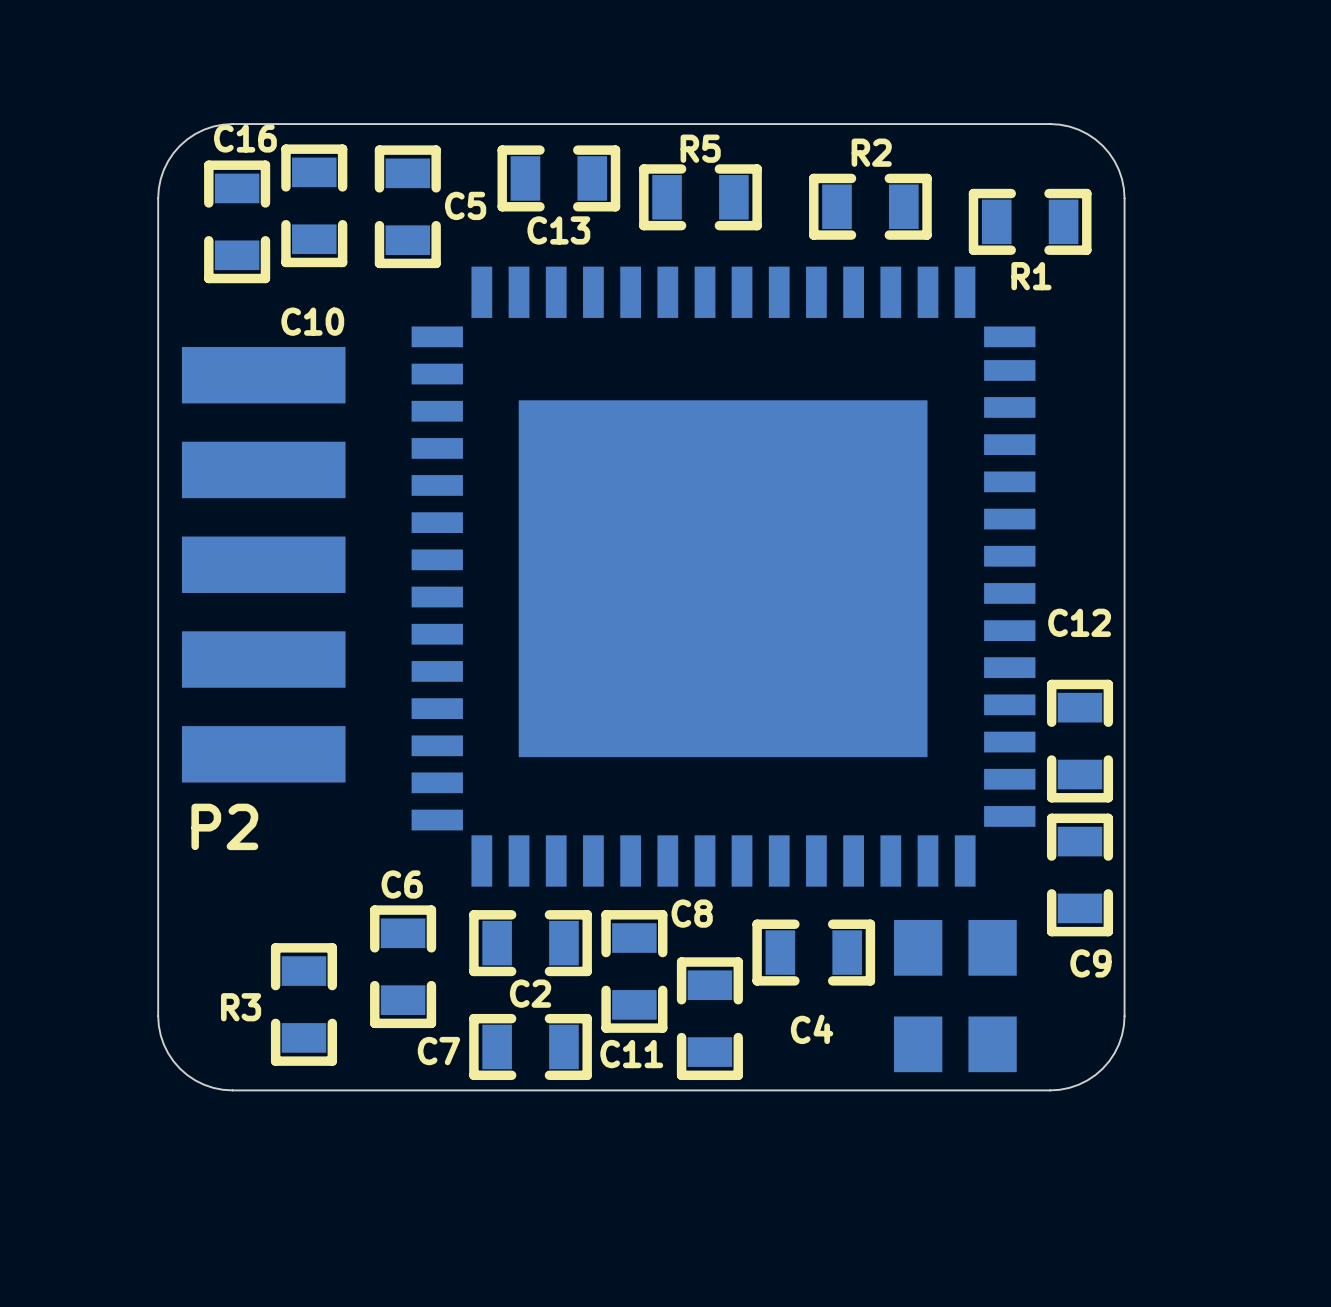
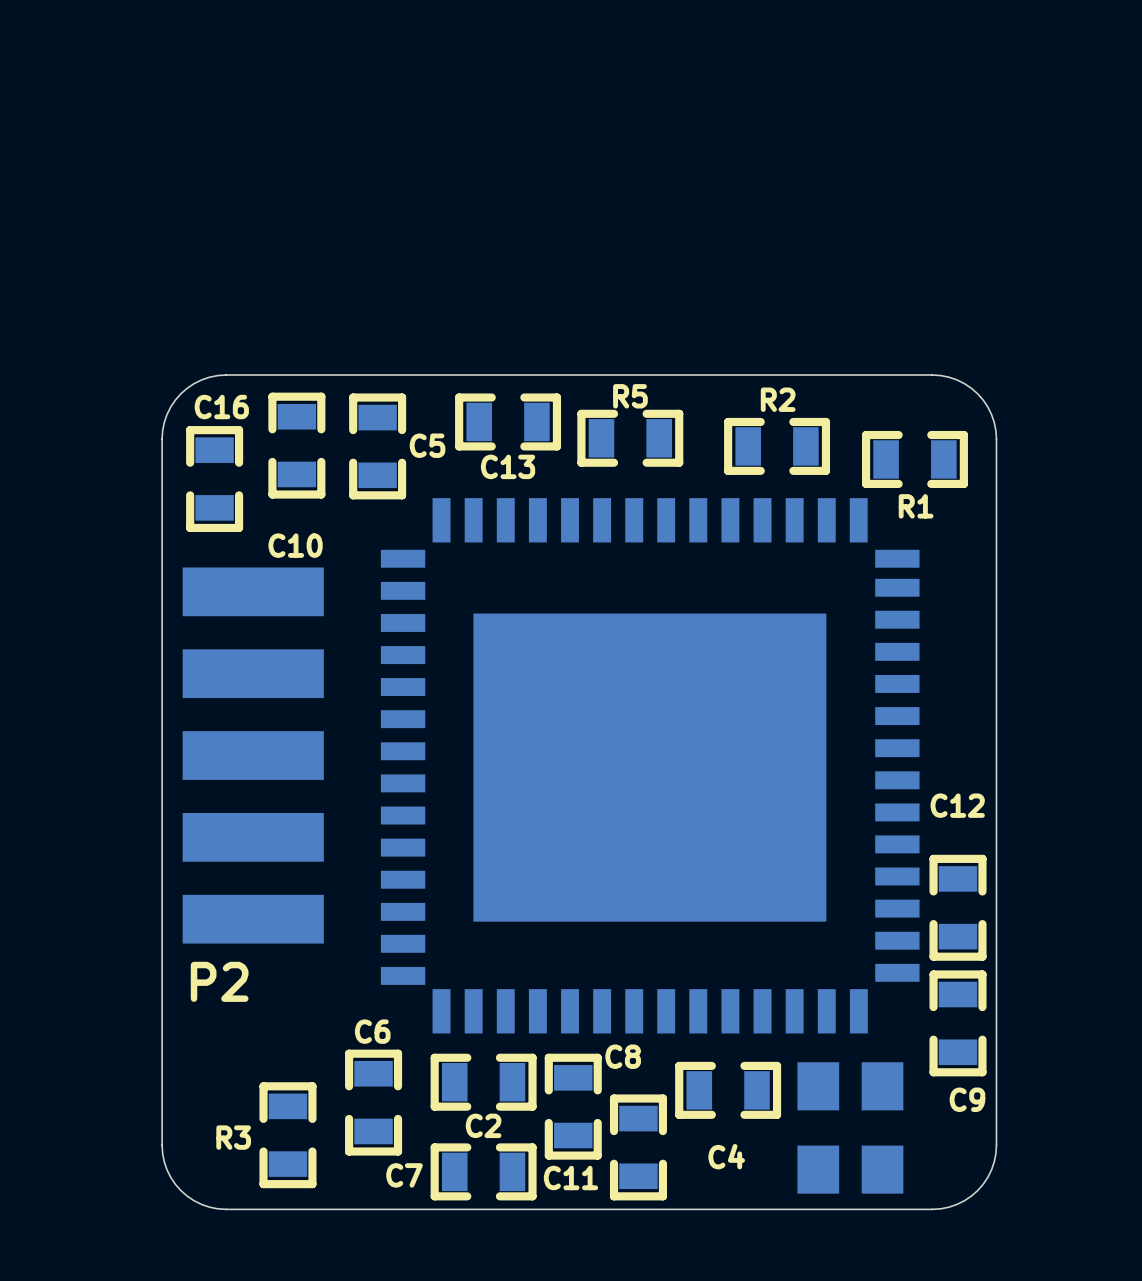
C16 position: (237, 221) -> (214, 479)

